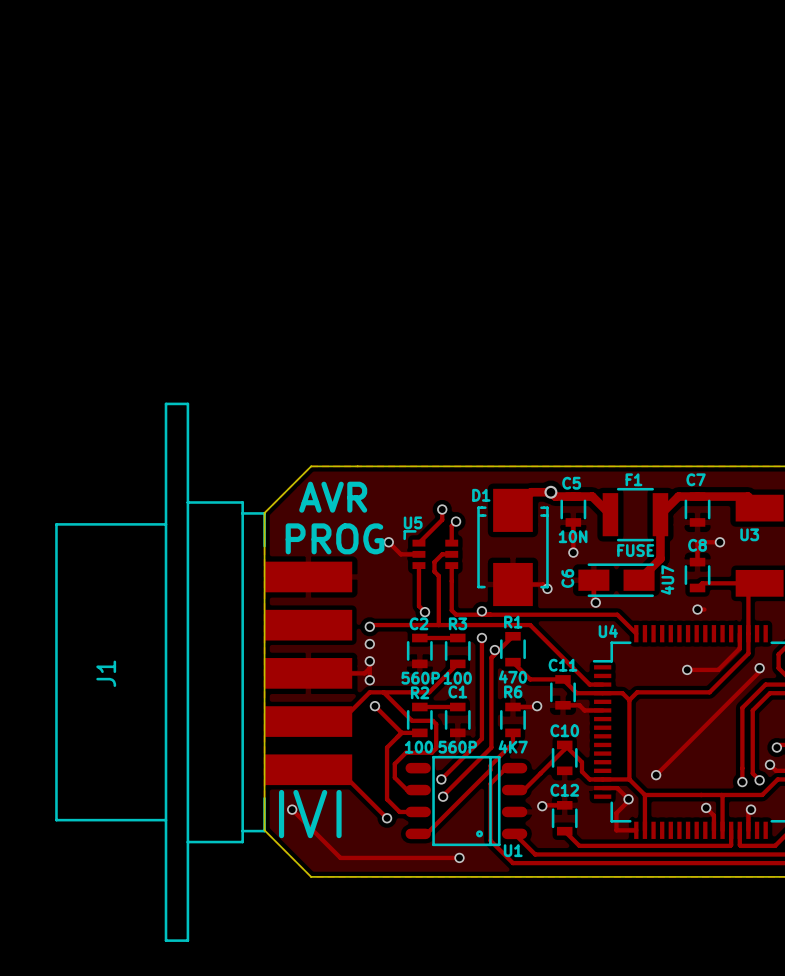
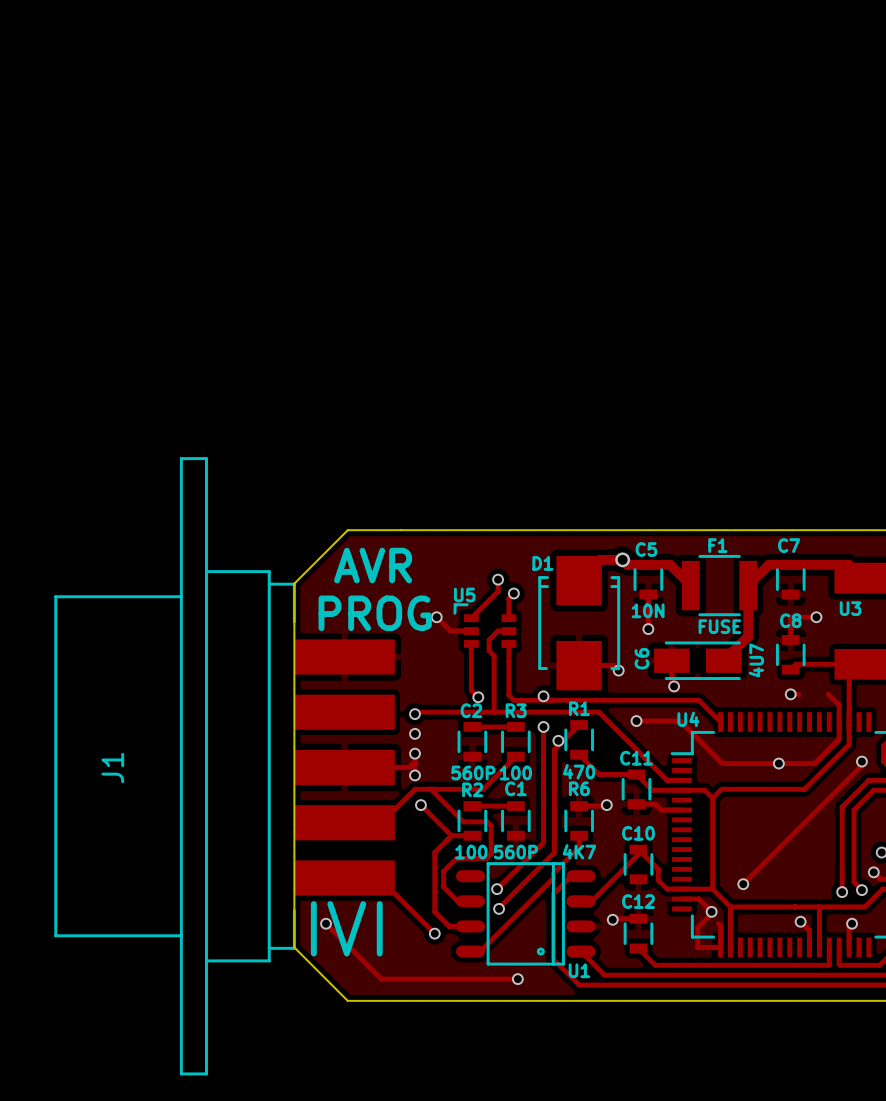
track: none -> (828, 694) (839, 705) (839, 722)
track: none -> (636, 721) (680, 721) (722, 763) (778, 763)
via: none -> (636, 721)
track: none -> (718, 923) (720, 925) (720, 947)

